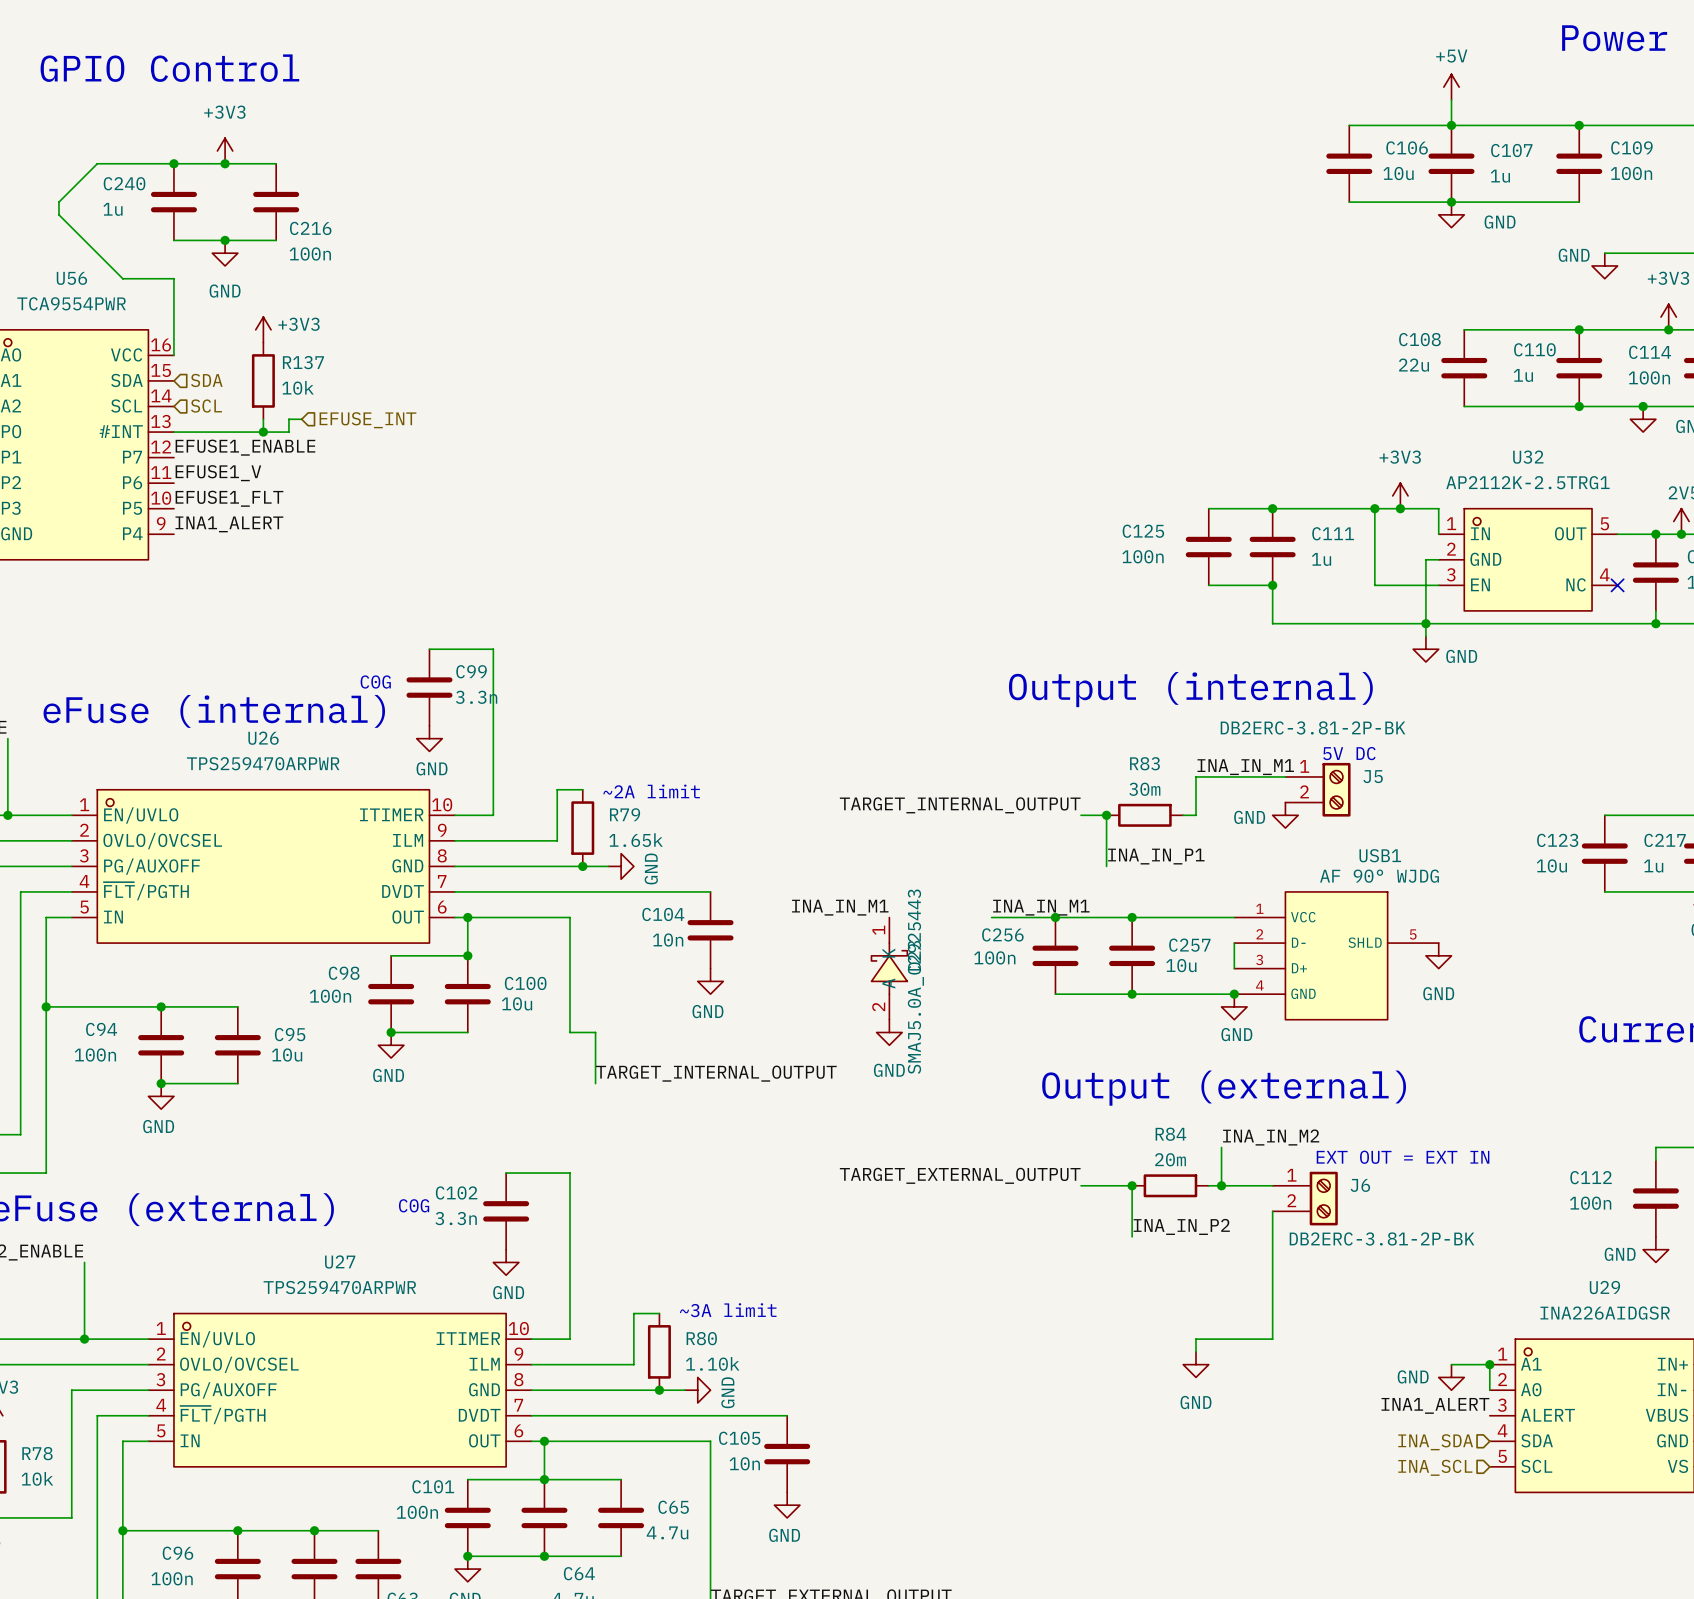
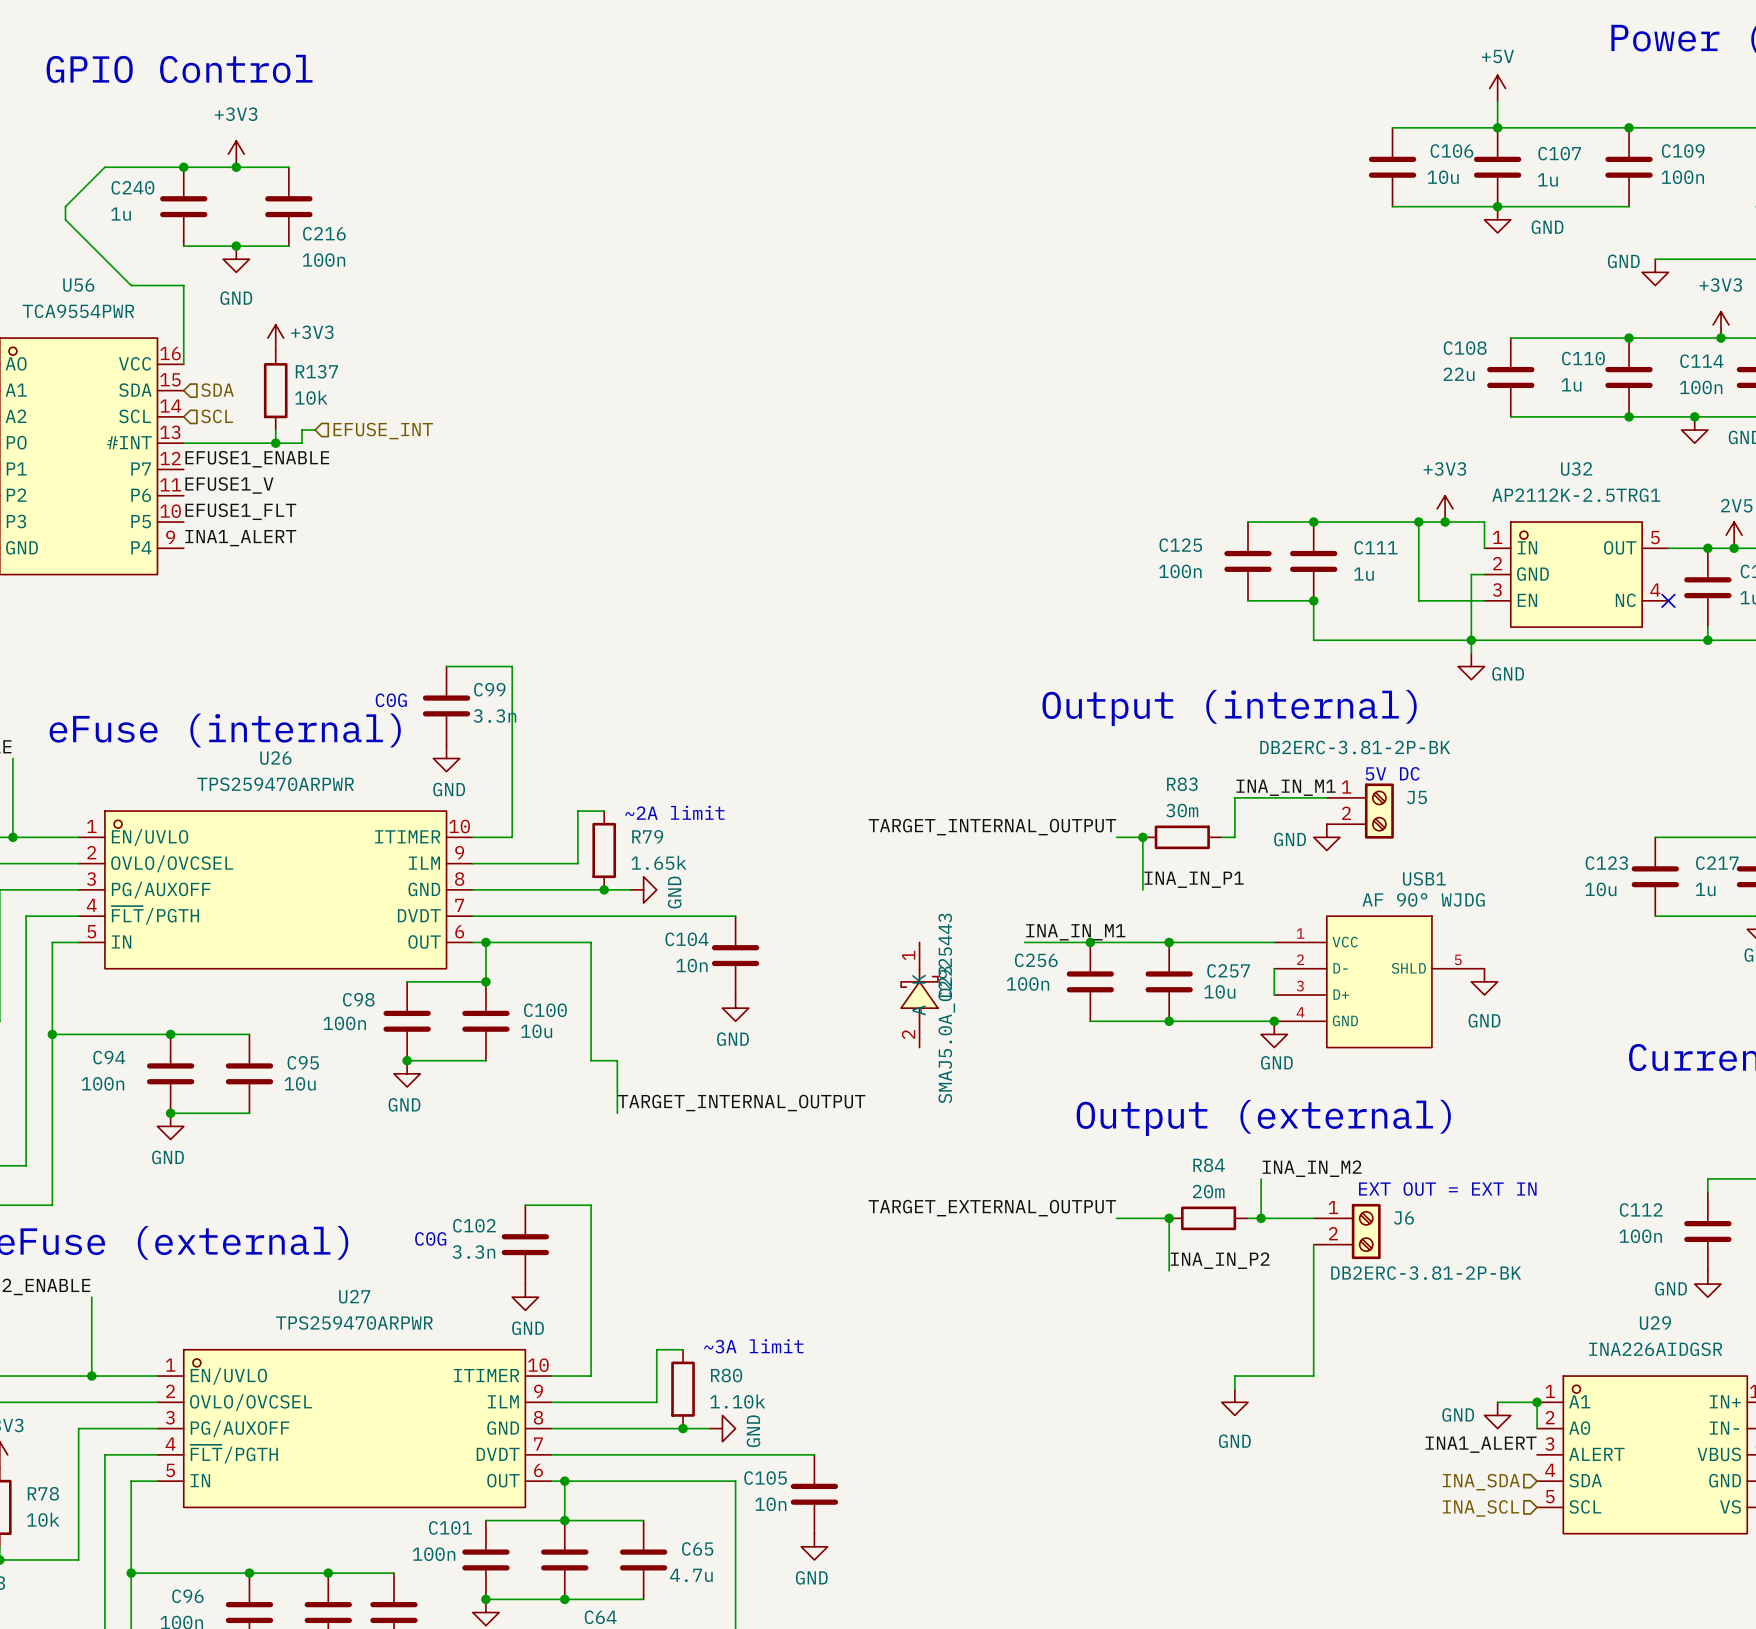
label: INA_IN_M1 (840, 907) -> none
power symbol: GND (889, 1032) -> none

